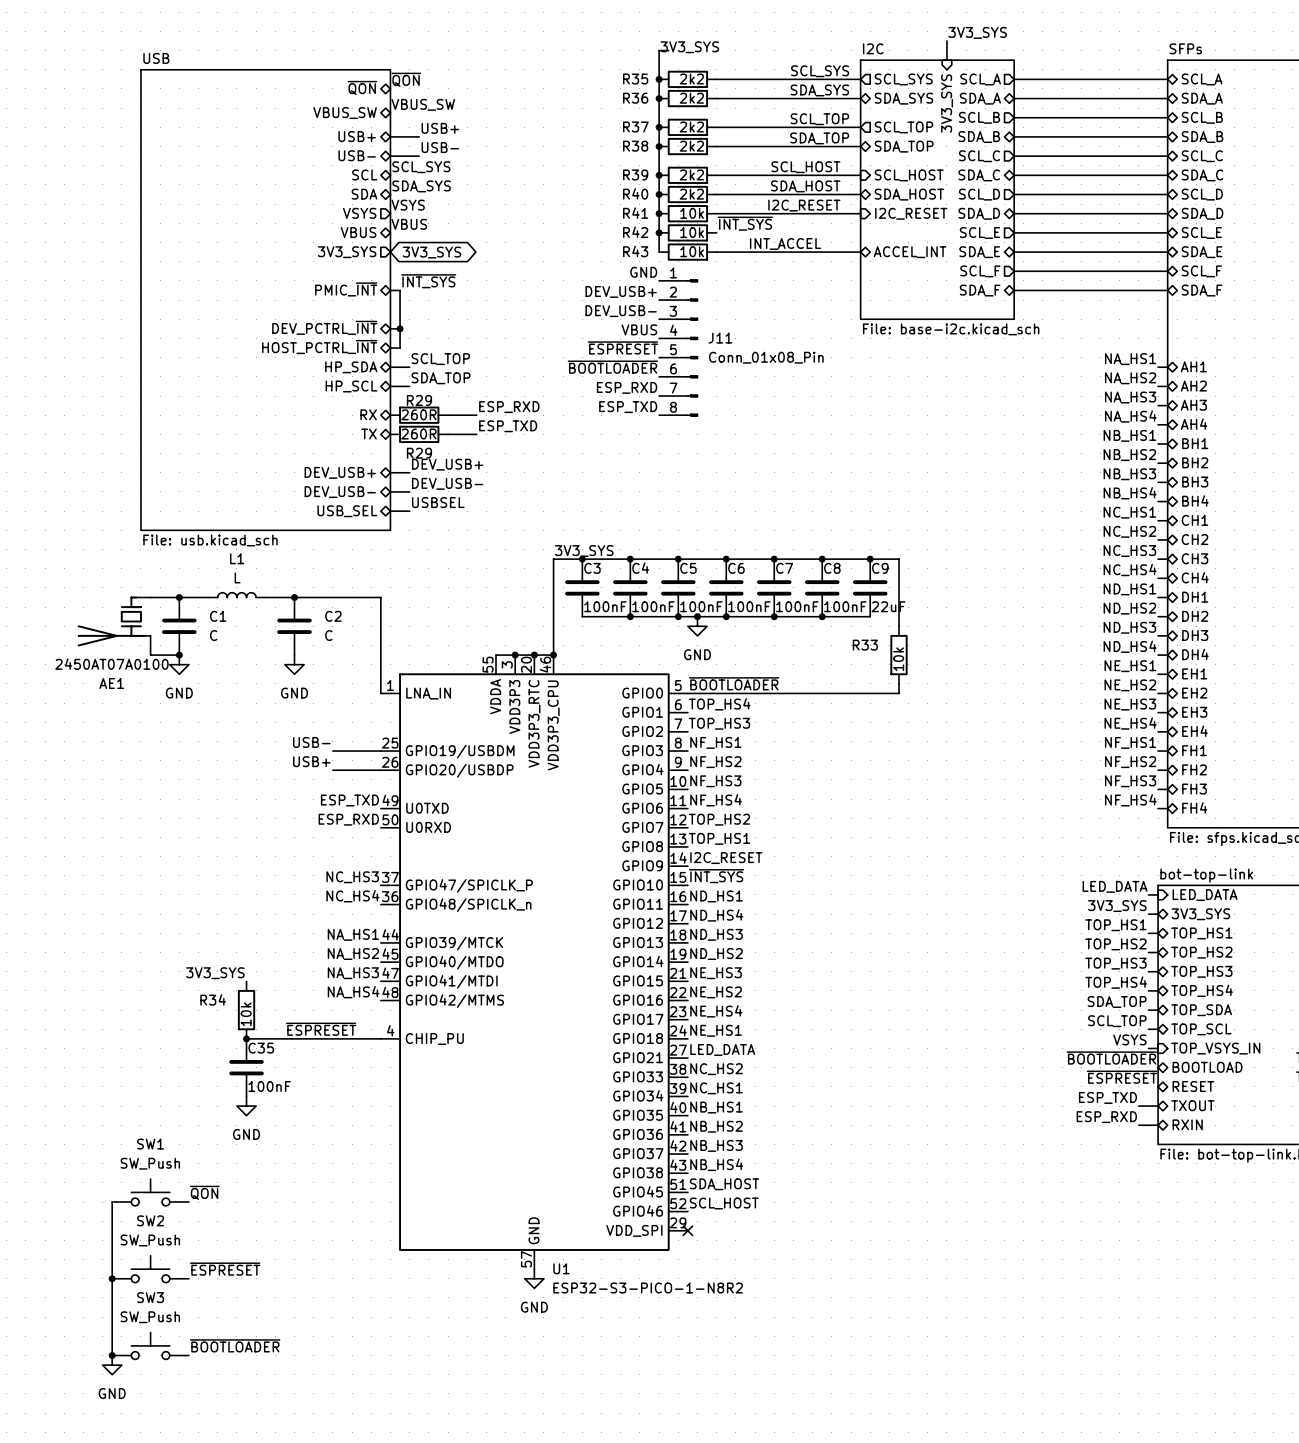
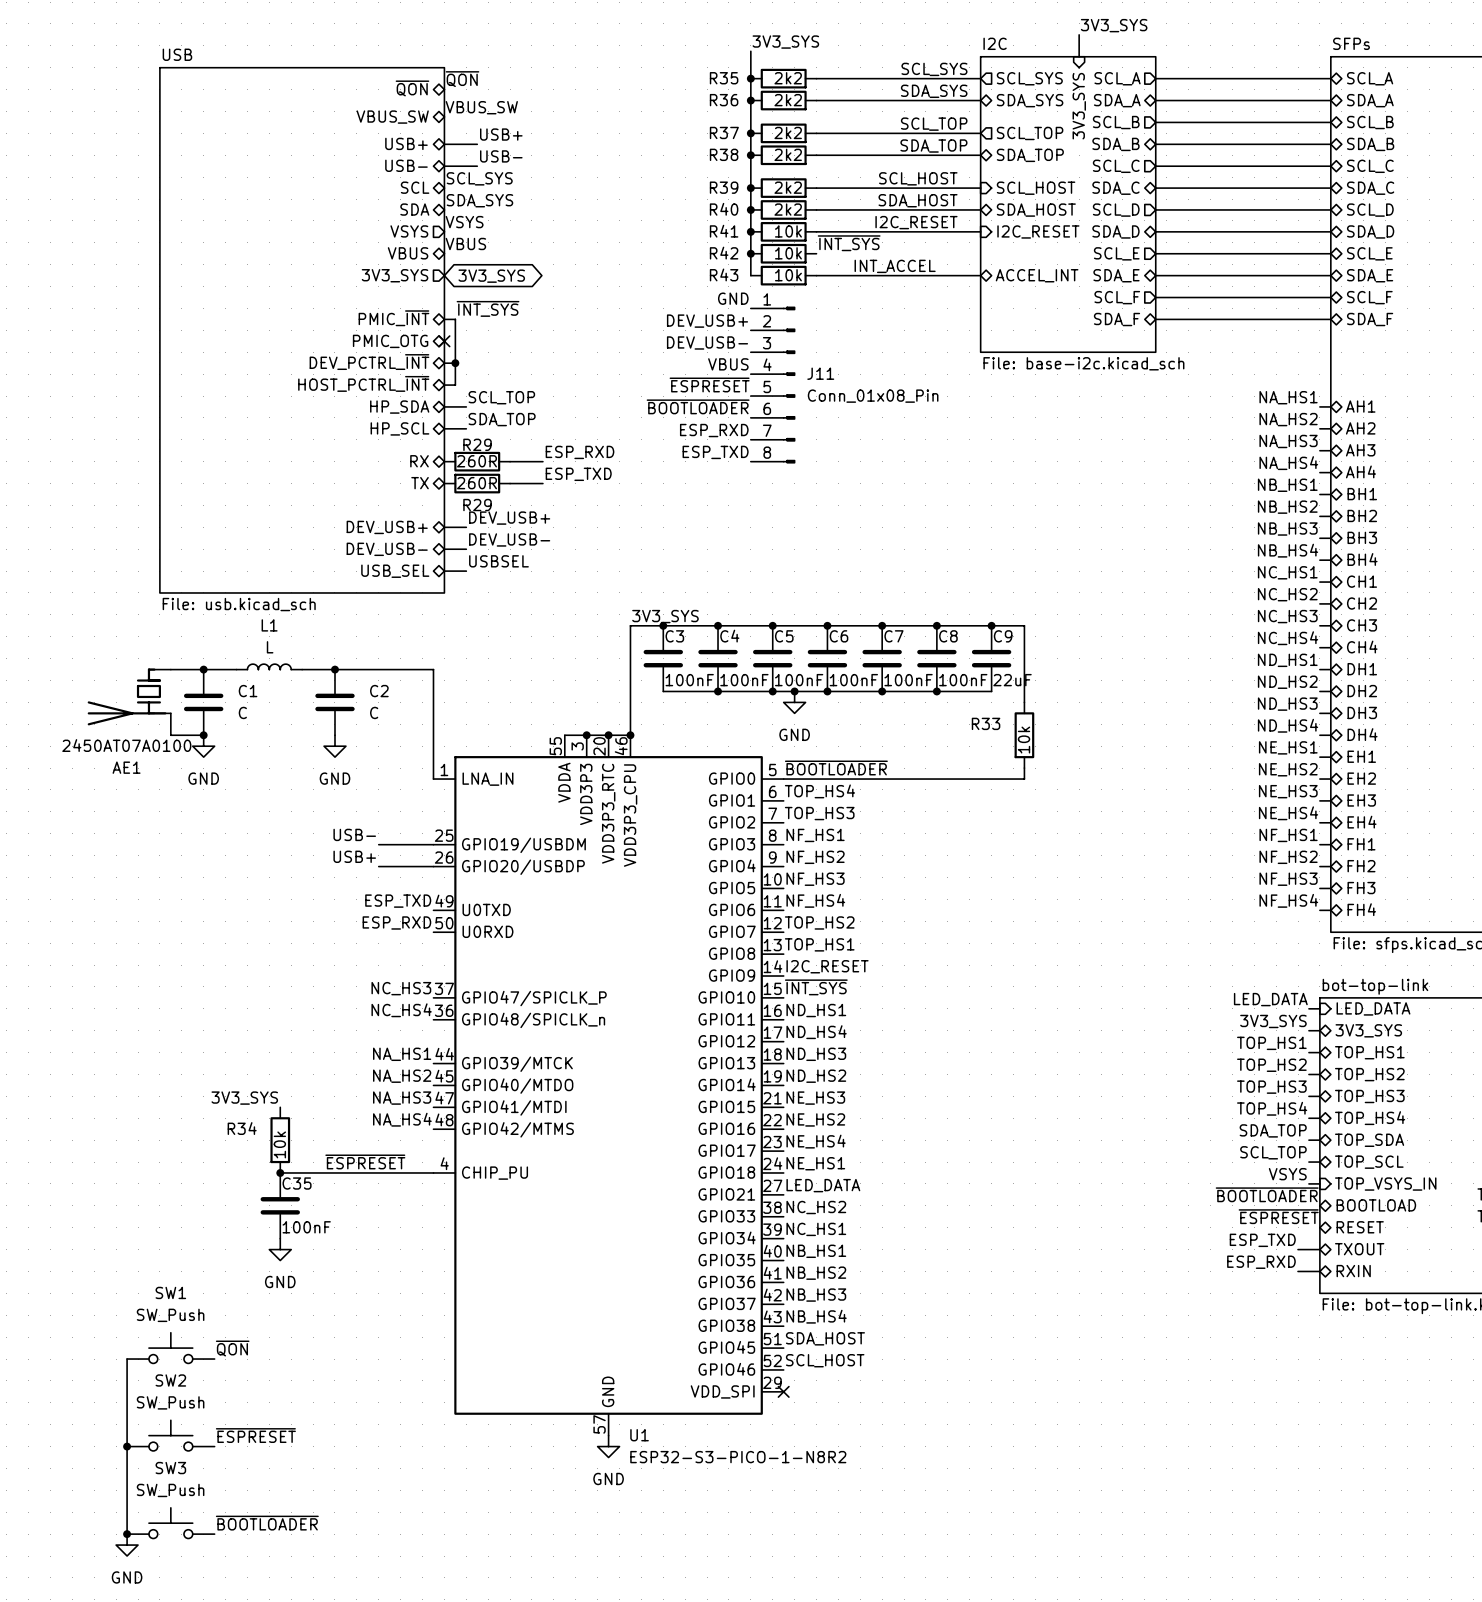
wire: (668, 50) (659, 50) (659, 55) -> none
sheet pin: none -> PMIC_OTG (390, 341)
no-connect mark: none -> (444, 341)

